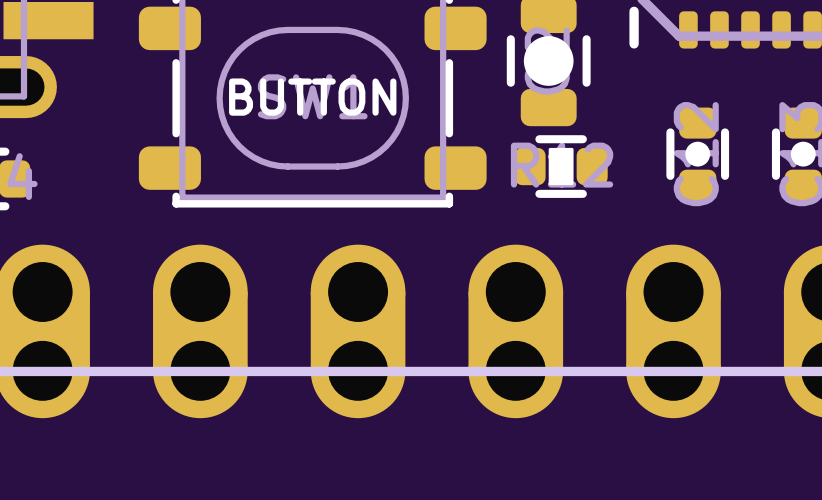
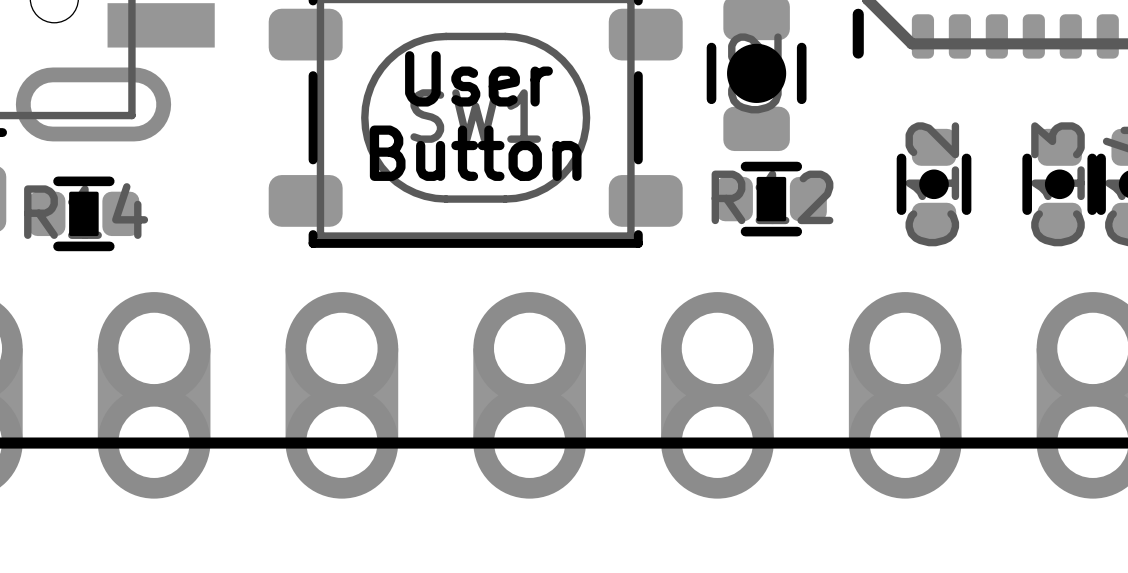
text: none -> User (478, 78)
text: BUTTON (312, 97) -> none
text: none -> Button (475, 153)

